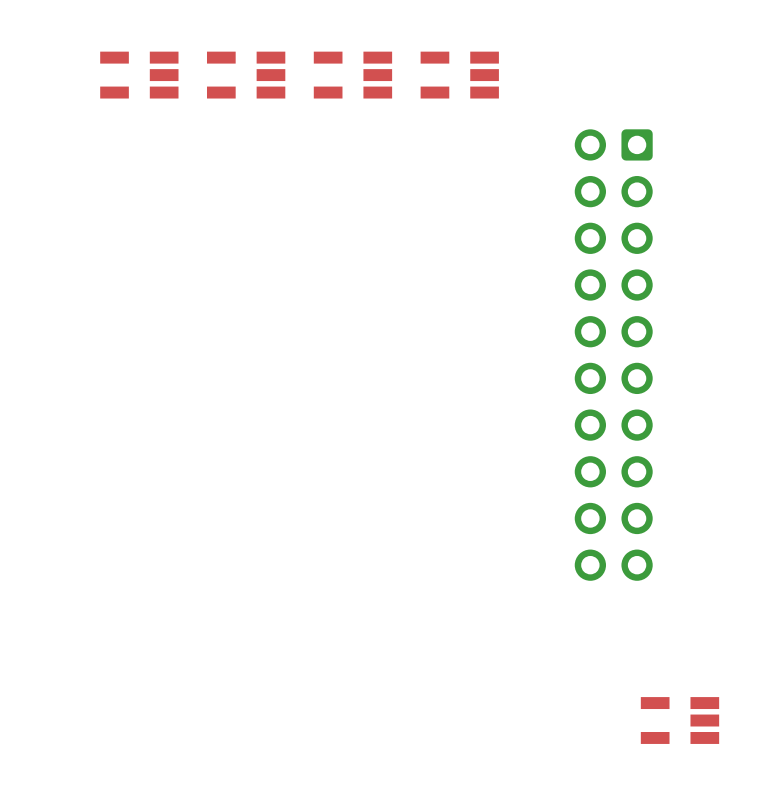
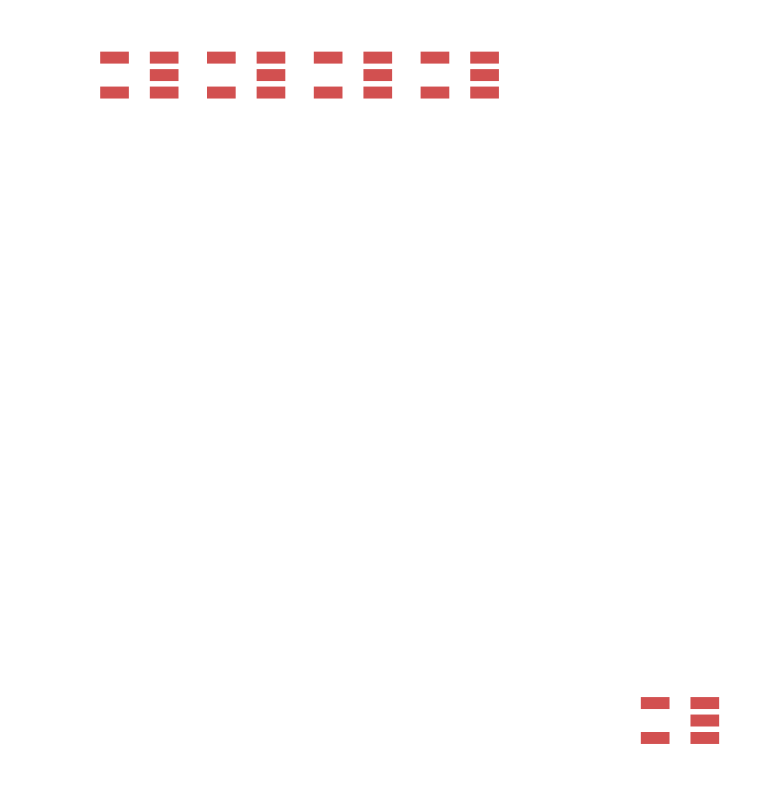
part: (613, 355) -> none

